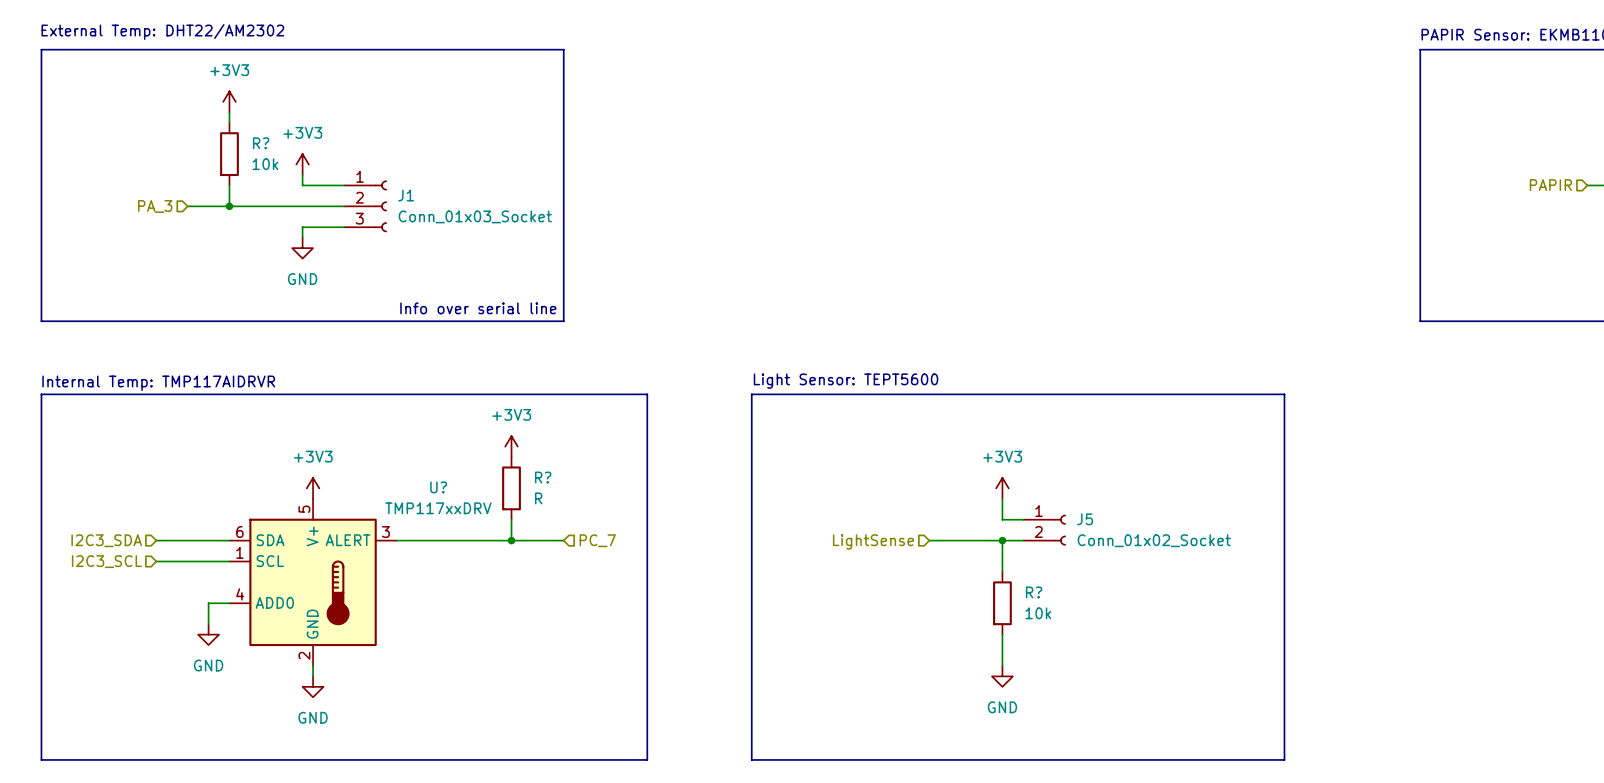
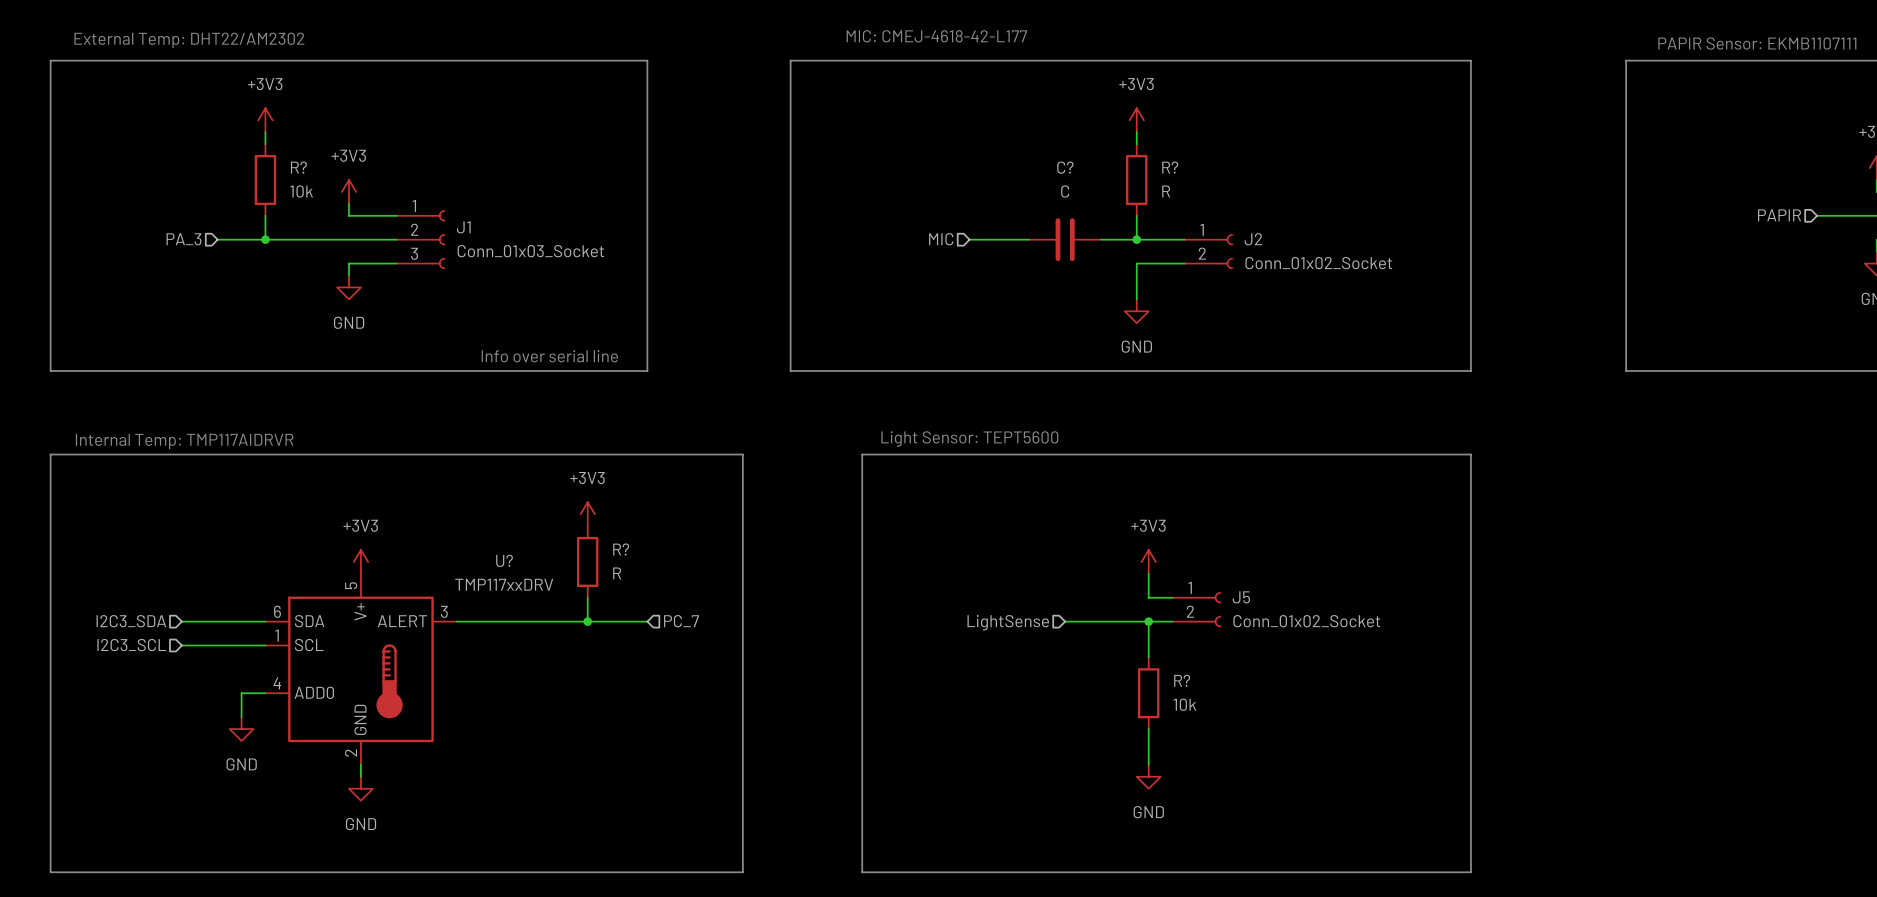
text: none -> MIC: CMEJ-4618-42-L177 (936, 36)
line: none -> (790, 60) (1470, 60) (1470, 370) (790, 370) (790, 60)
power symbol: none -> +3V3 (1136, 120)
wire: none -> (1136, 132) (1136, 144)
R?: none -> R (1136, 180)
wire: none -> (1136, 215) (1136, 239)
hierarchical label: none -> MIC (941, 239)
wire: none -> (969, 239) (1029, 239)
C?: none -> C (1065, 239)
wire: none -> (1100, 239) (1184, 239)
junction: none -> (1136, 239)
J2: none -> Conn_01x02_Socket (1208, 251)
wire: none -> (1184, 263) (1136, 263) (1136, 299)
power symbol: none -> GND (1136, 311)

